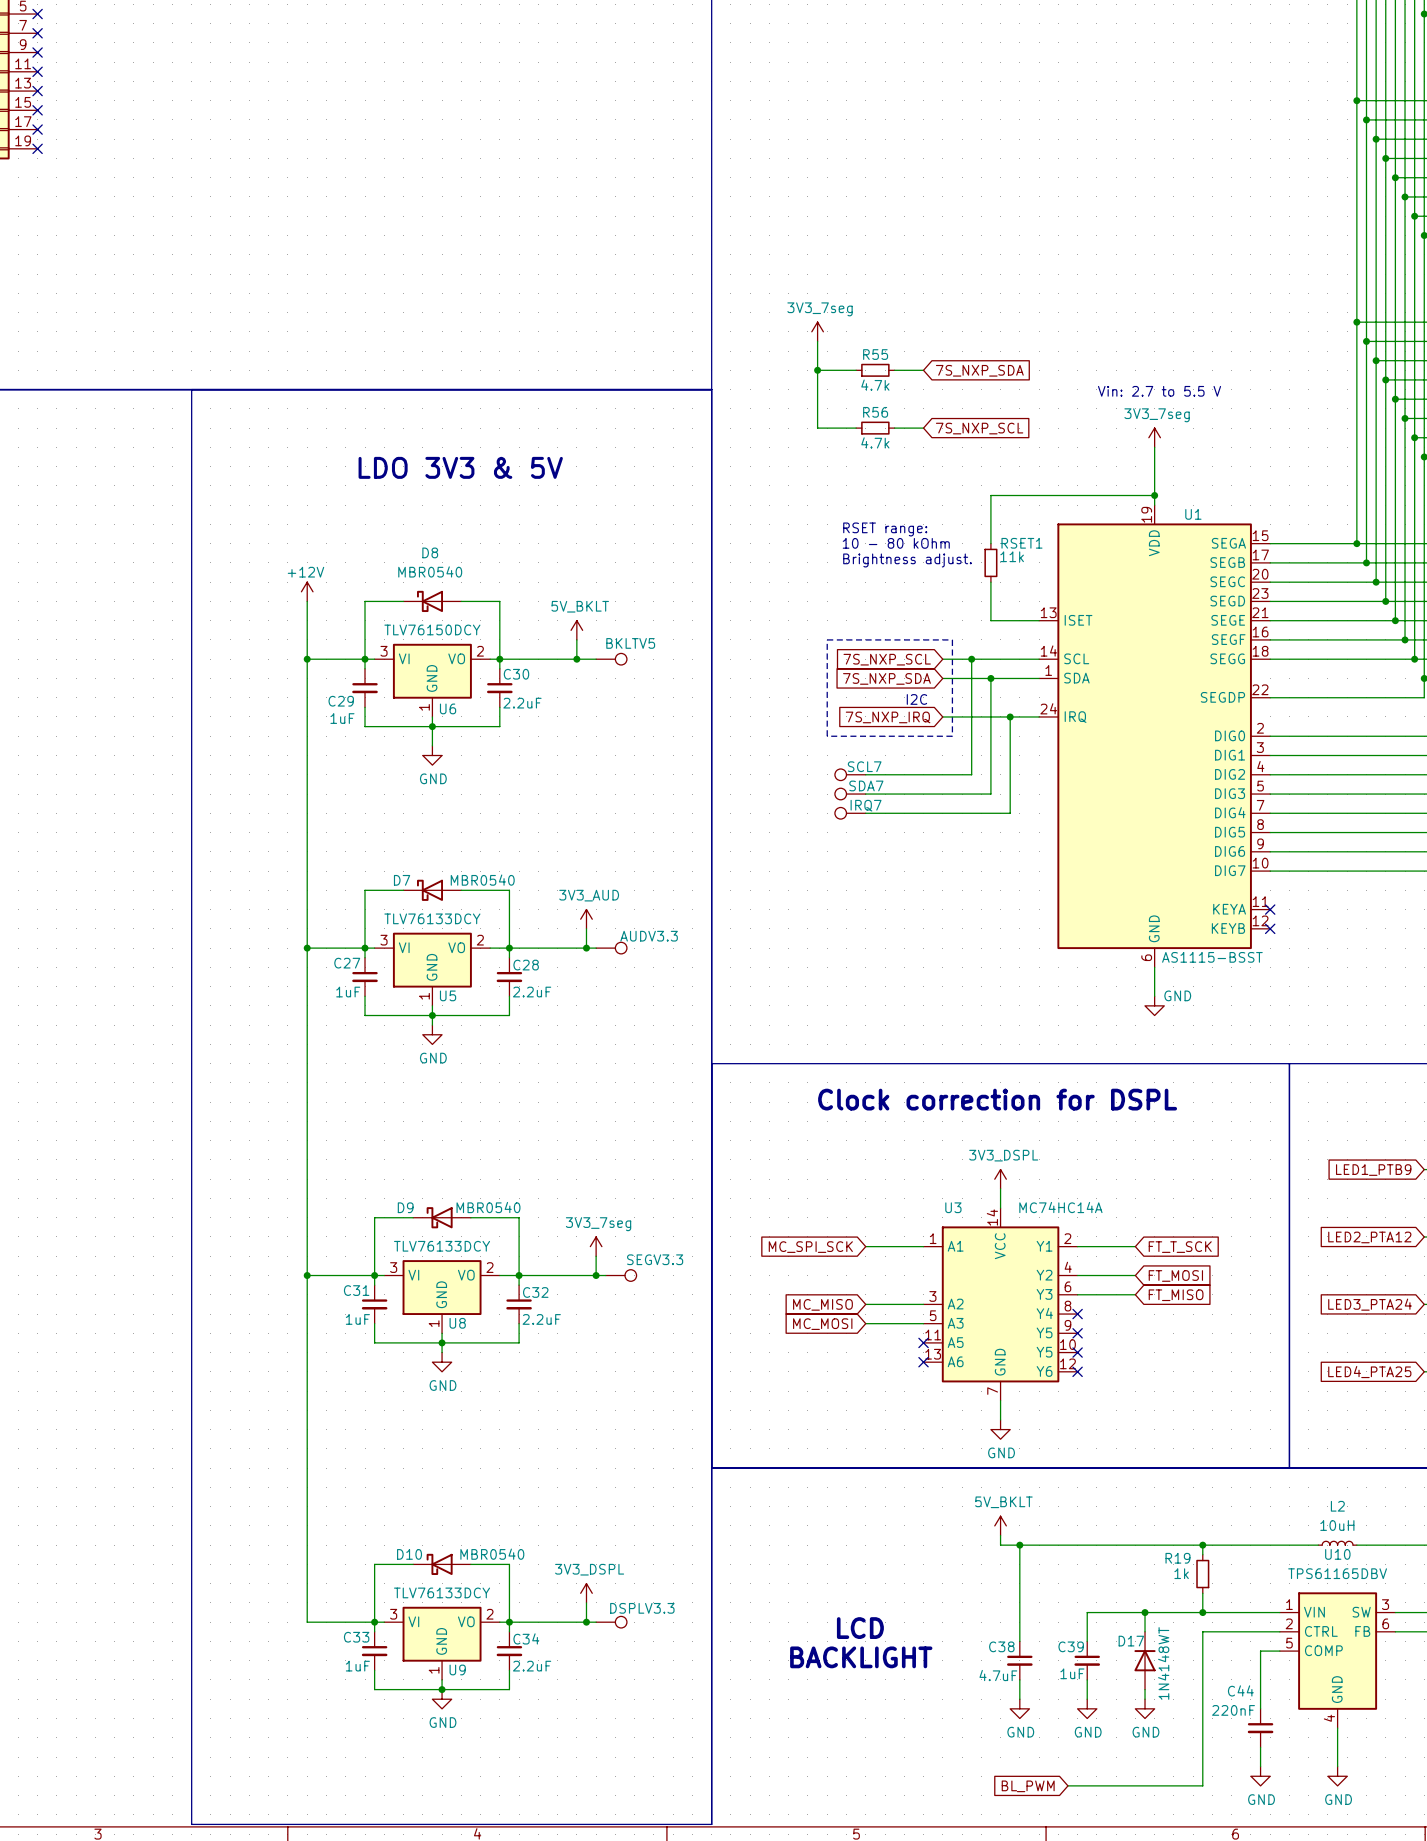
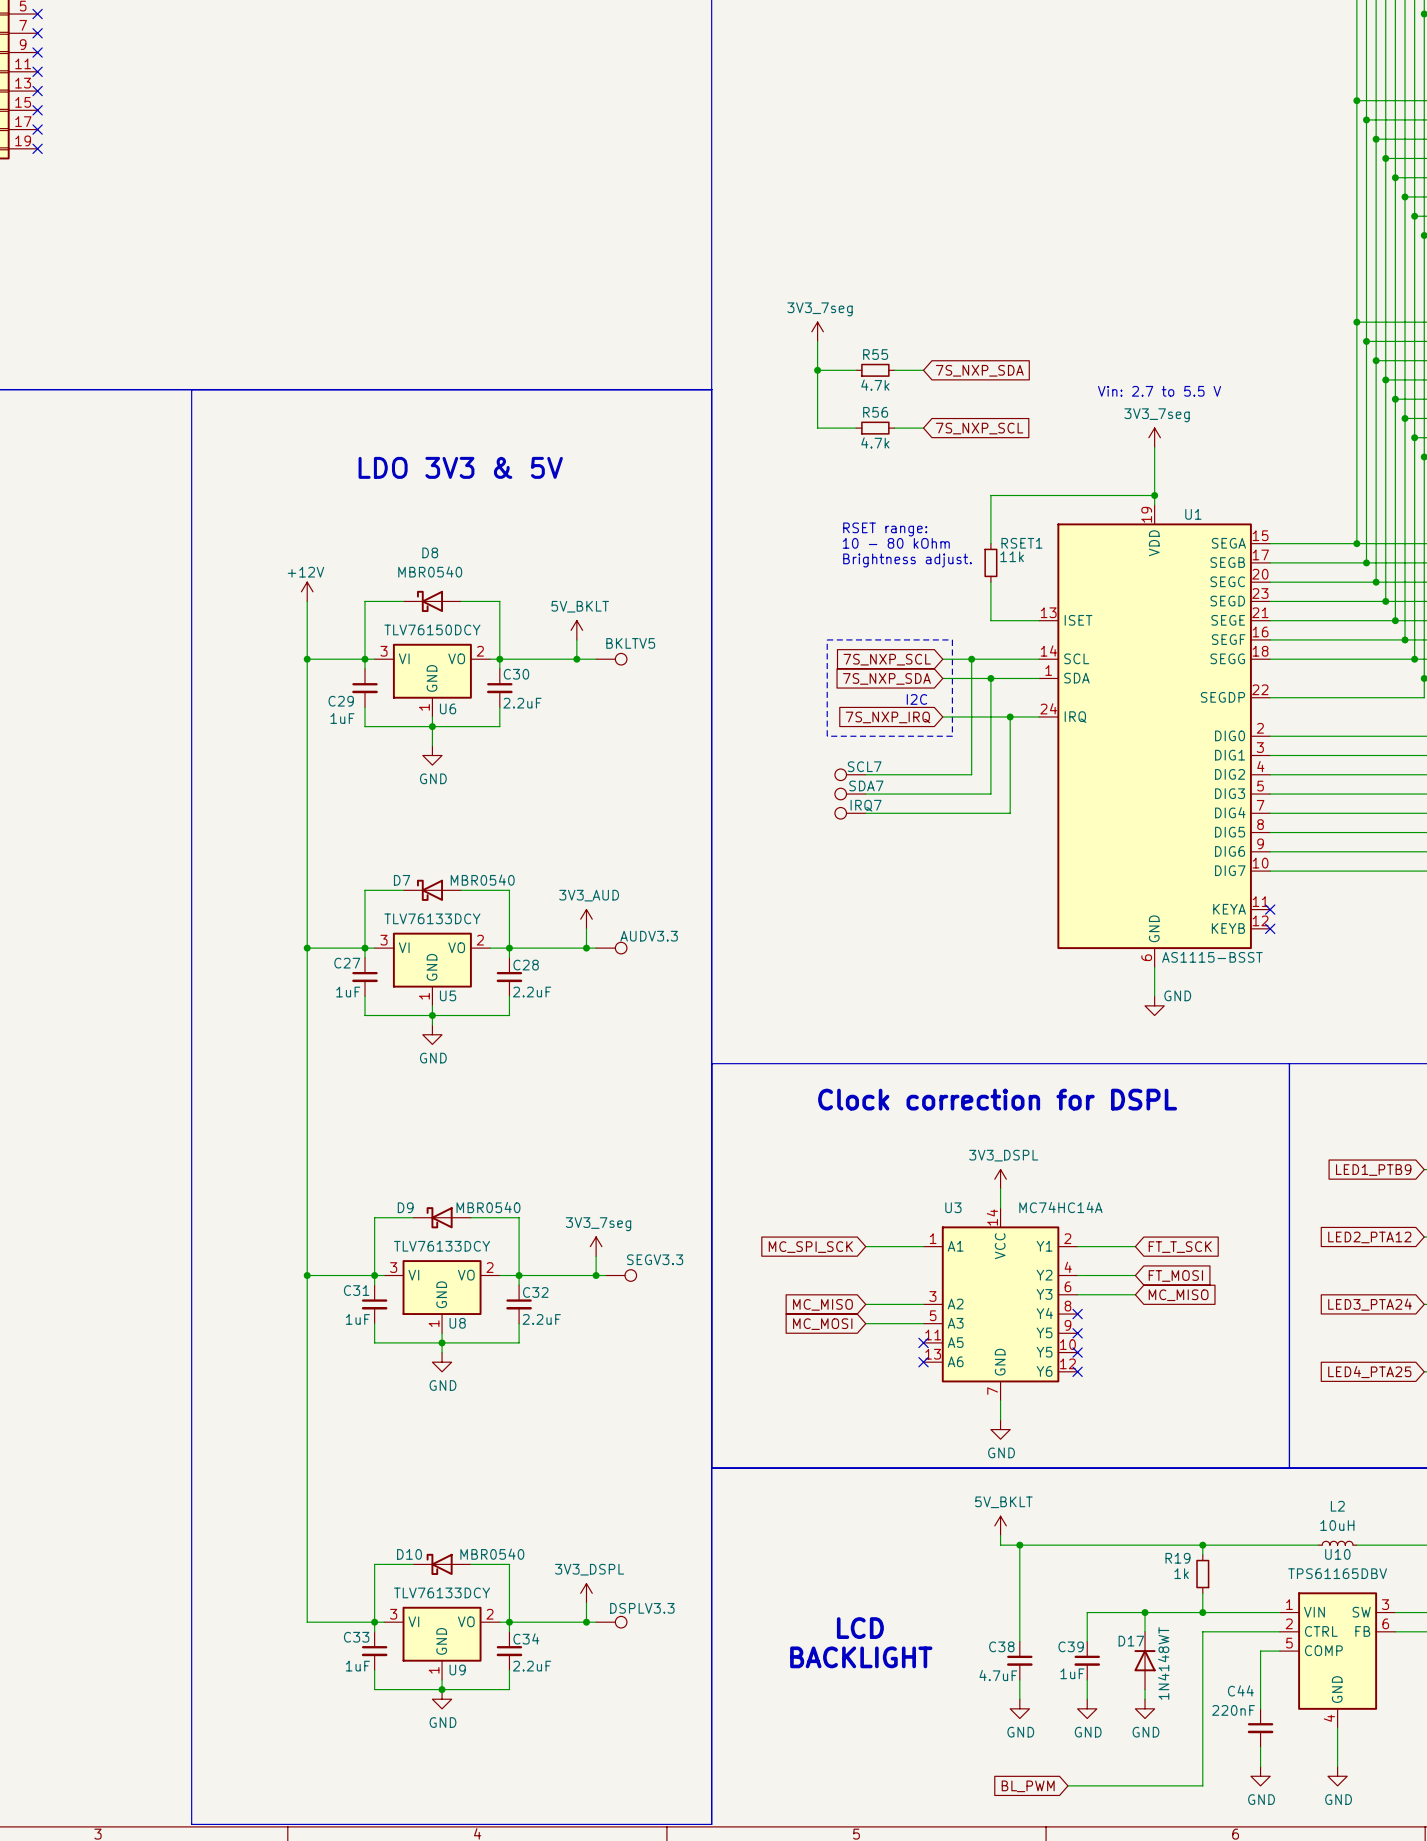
global label: FT_MISO (1176, 1295) -> MC_MISO (1178, 1295)

